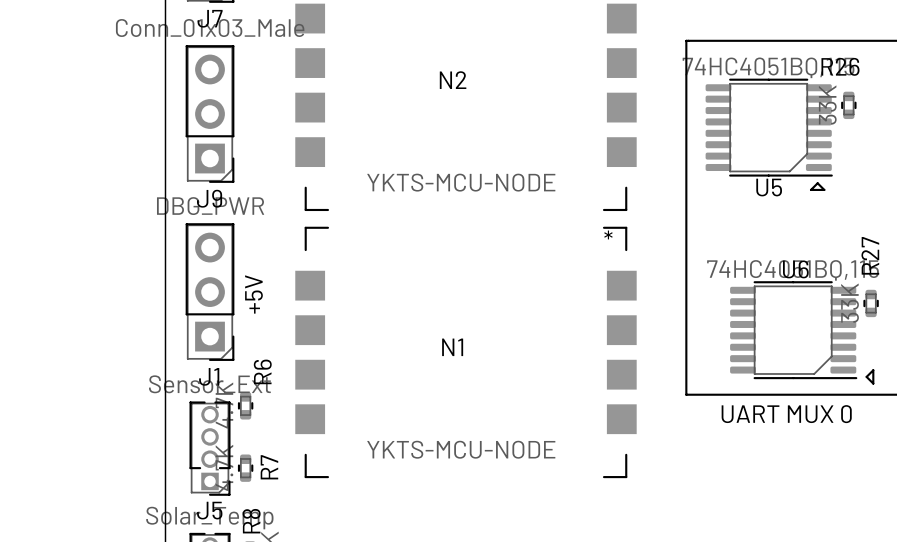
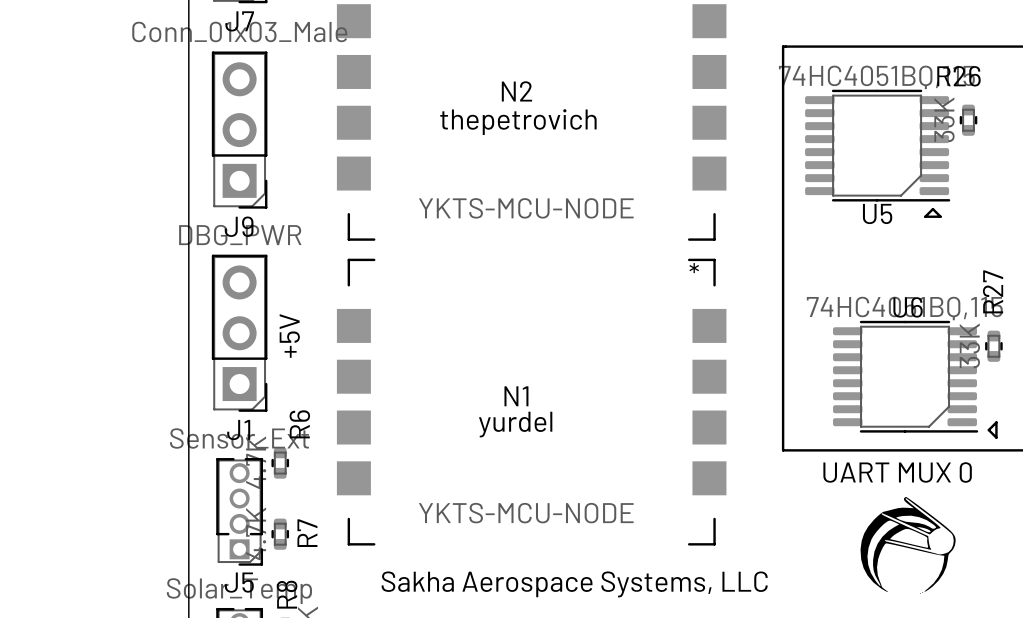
text: none -> thepetrovich (518, 122)
text: none -> yurdel (515, 424)
drawing: none -> [860, 497, 956, 595]
text: none -> Sakha Aerospace Systems, LLC (574, 584)

